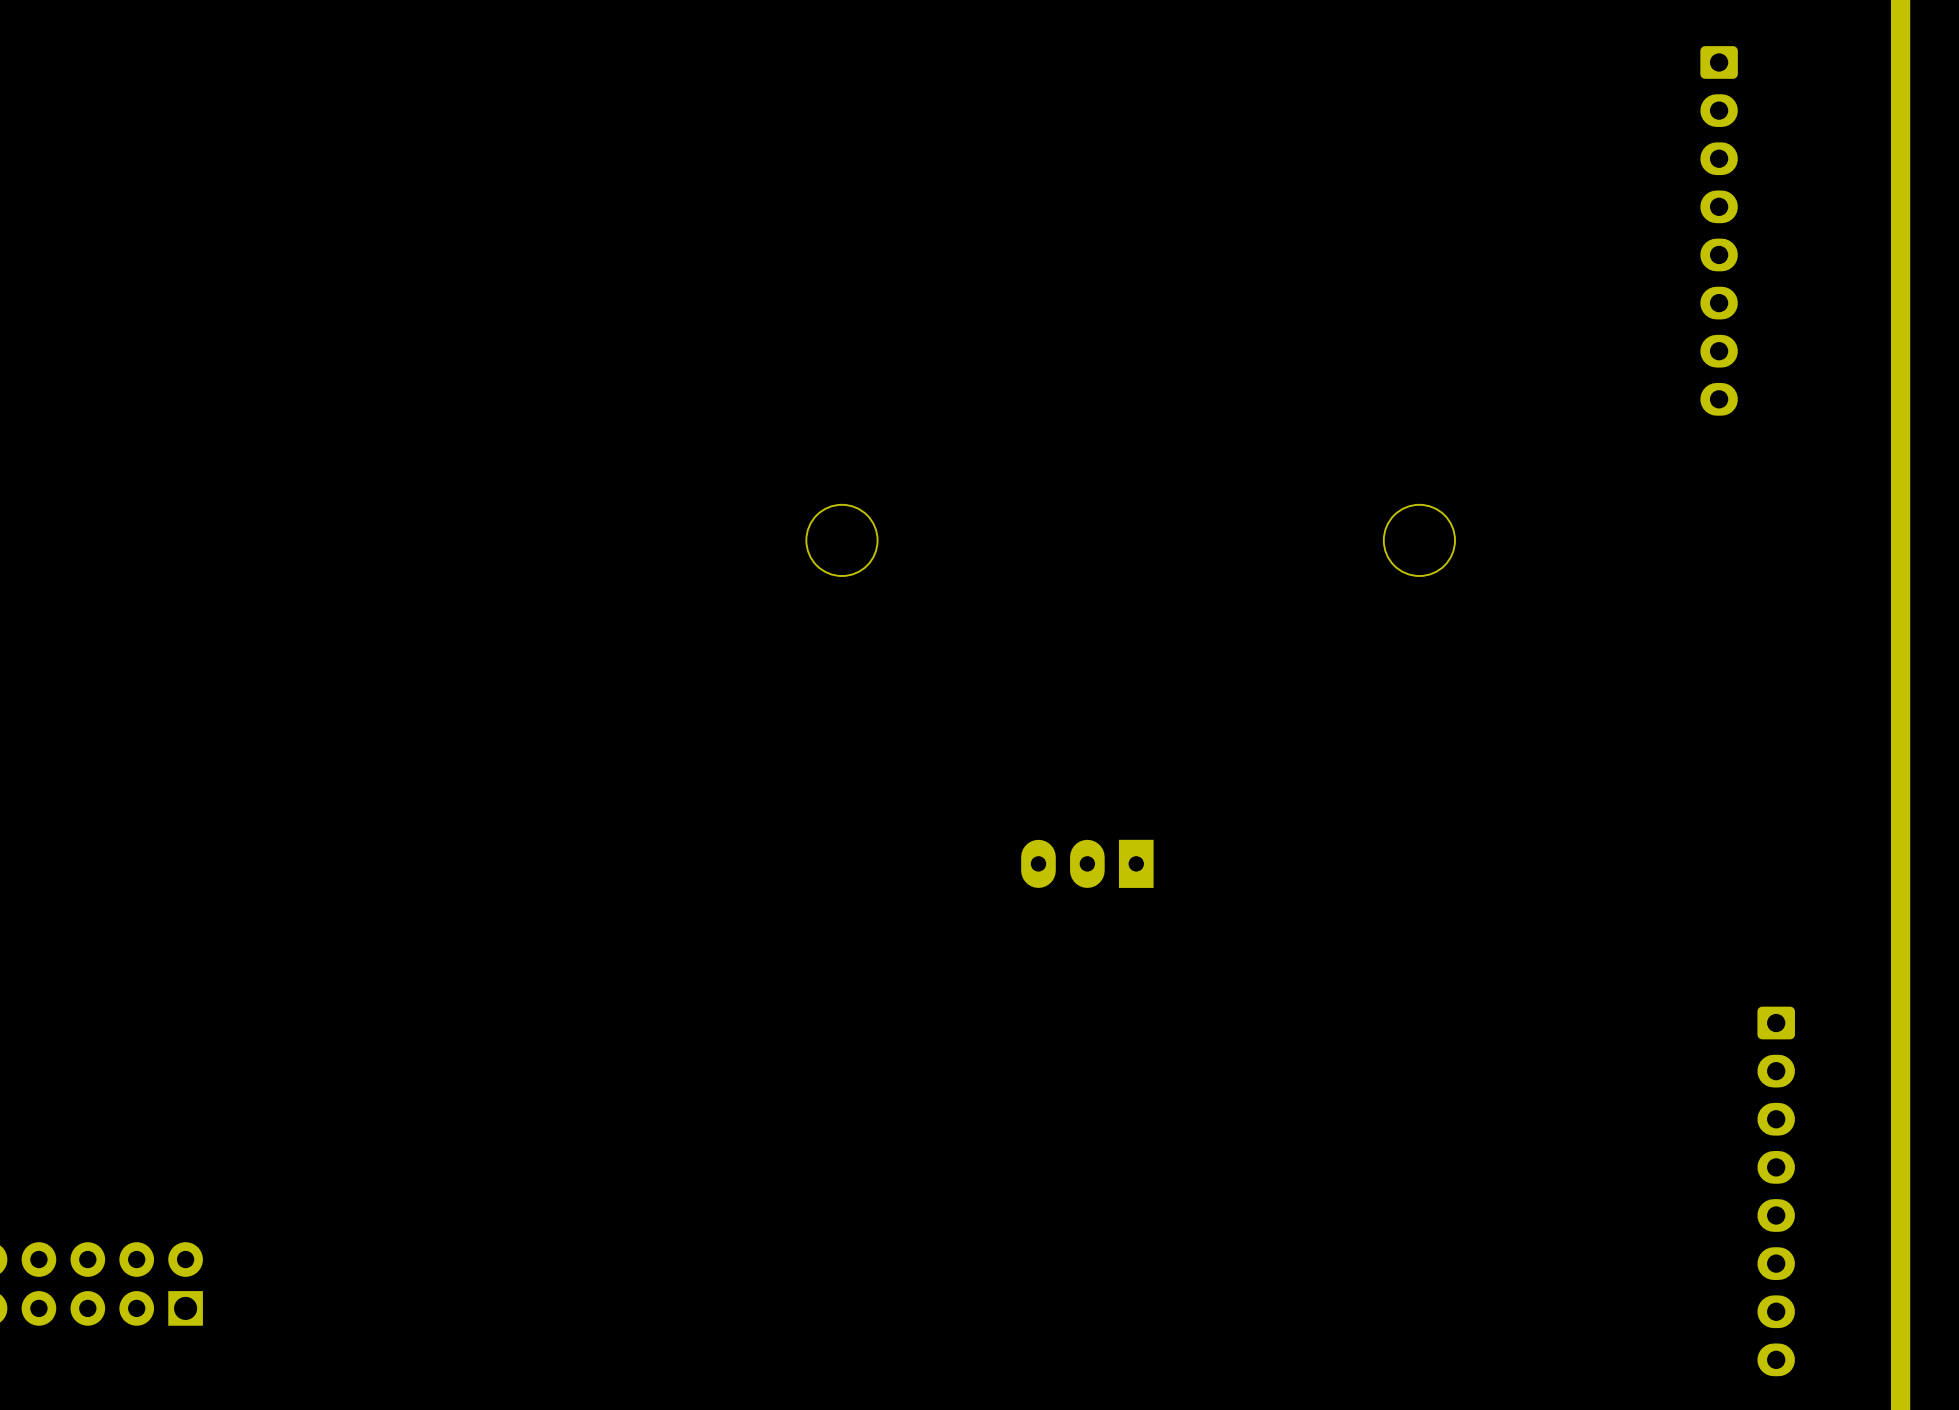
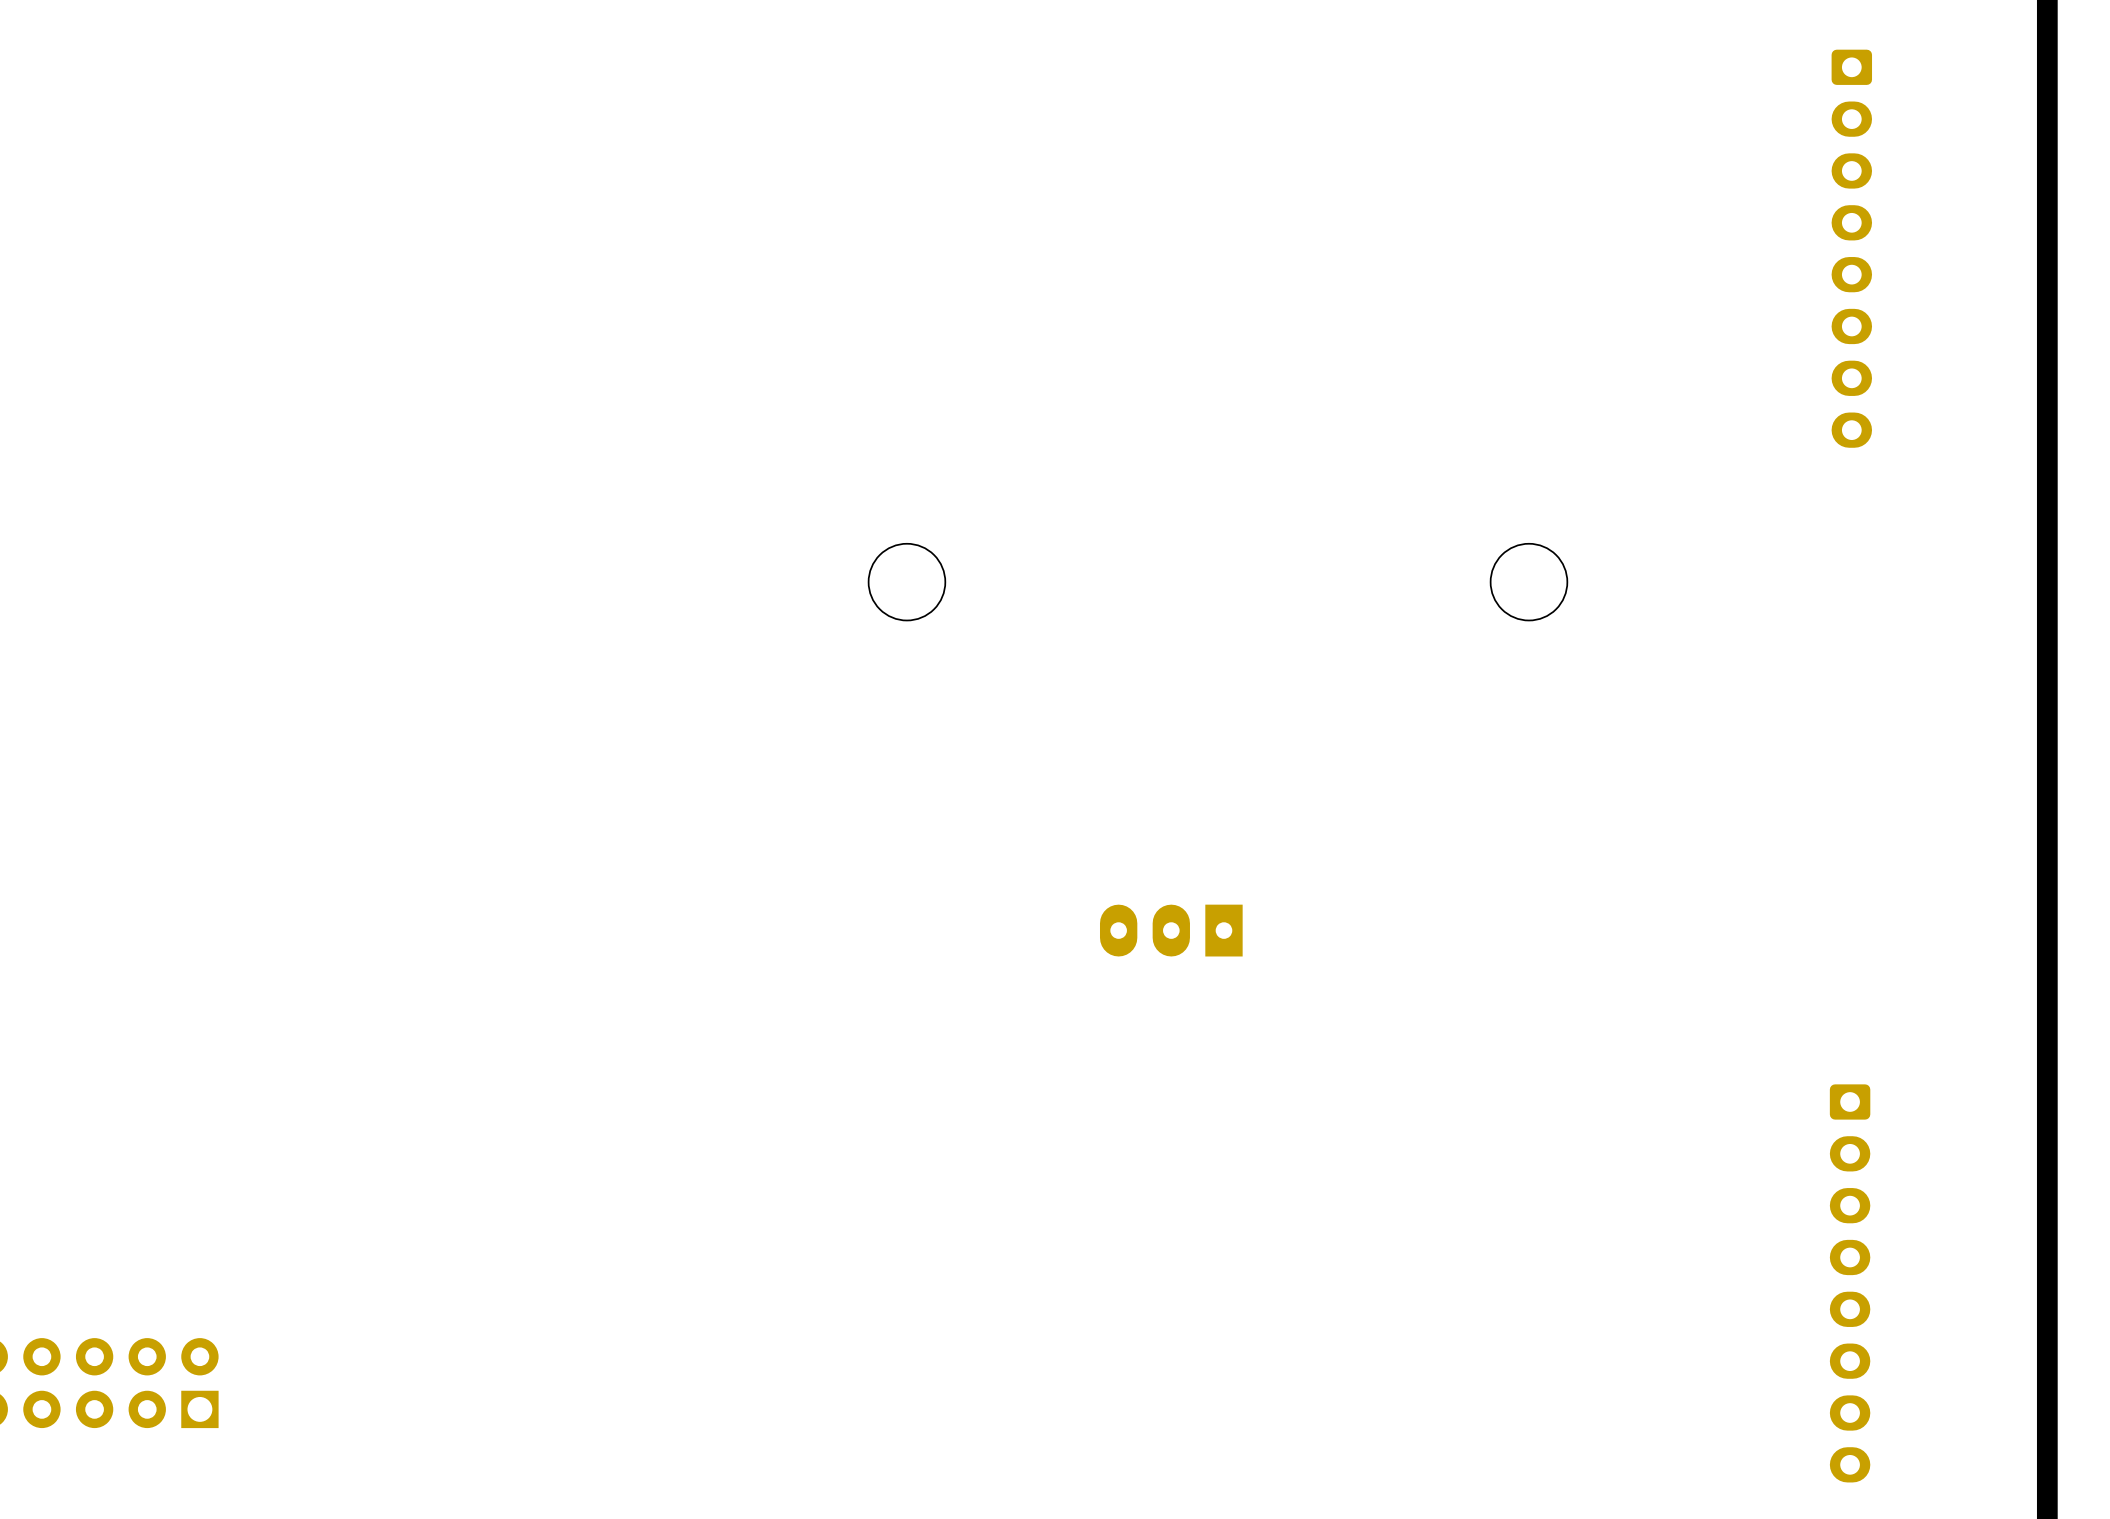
part position: (1776, 1191) -> (1850, 1283)

